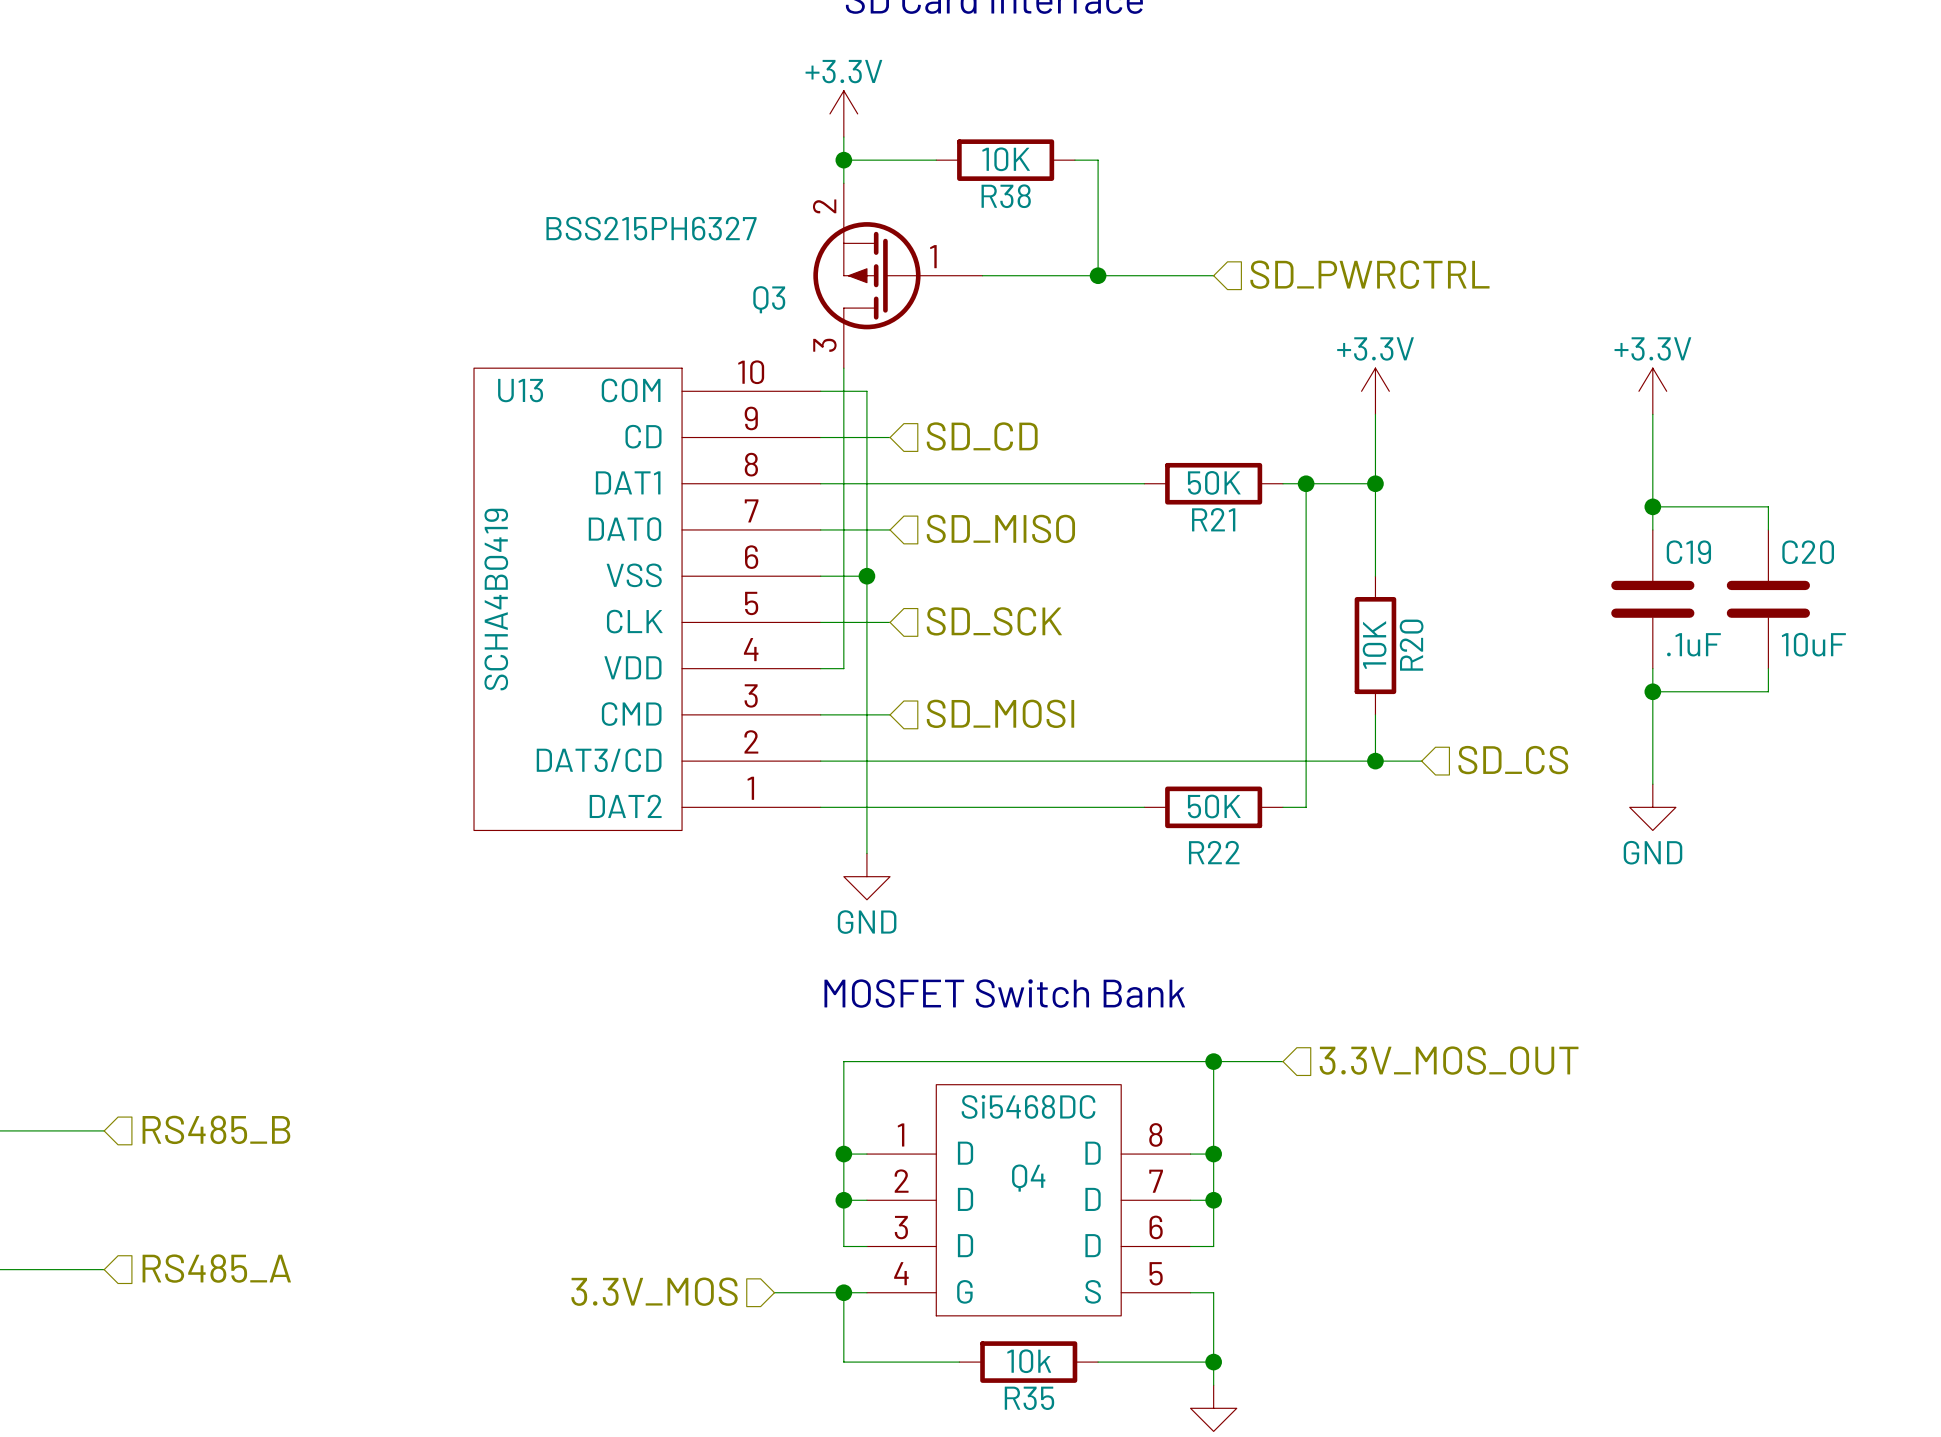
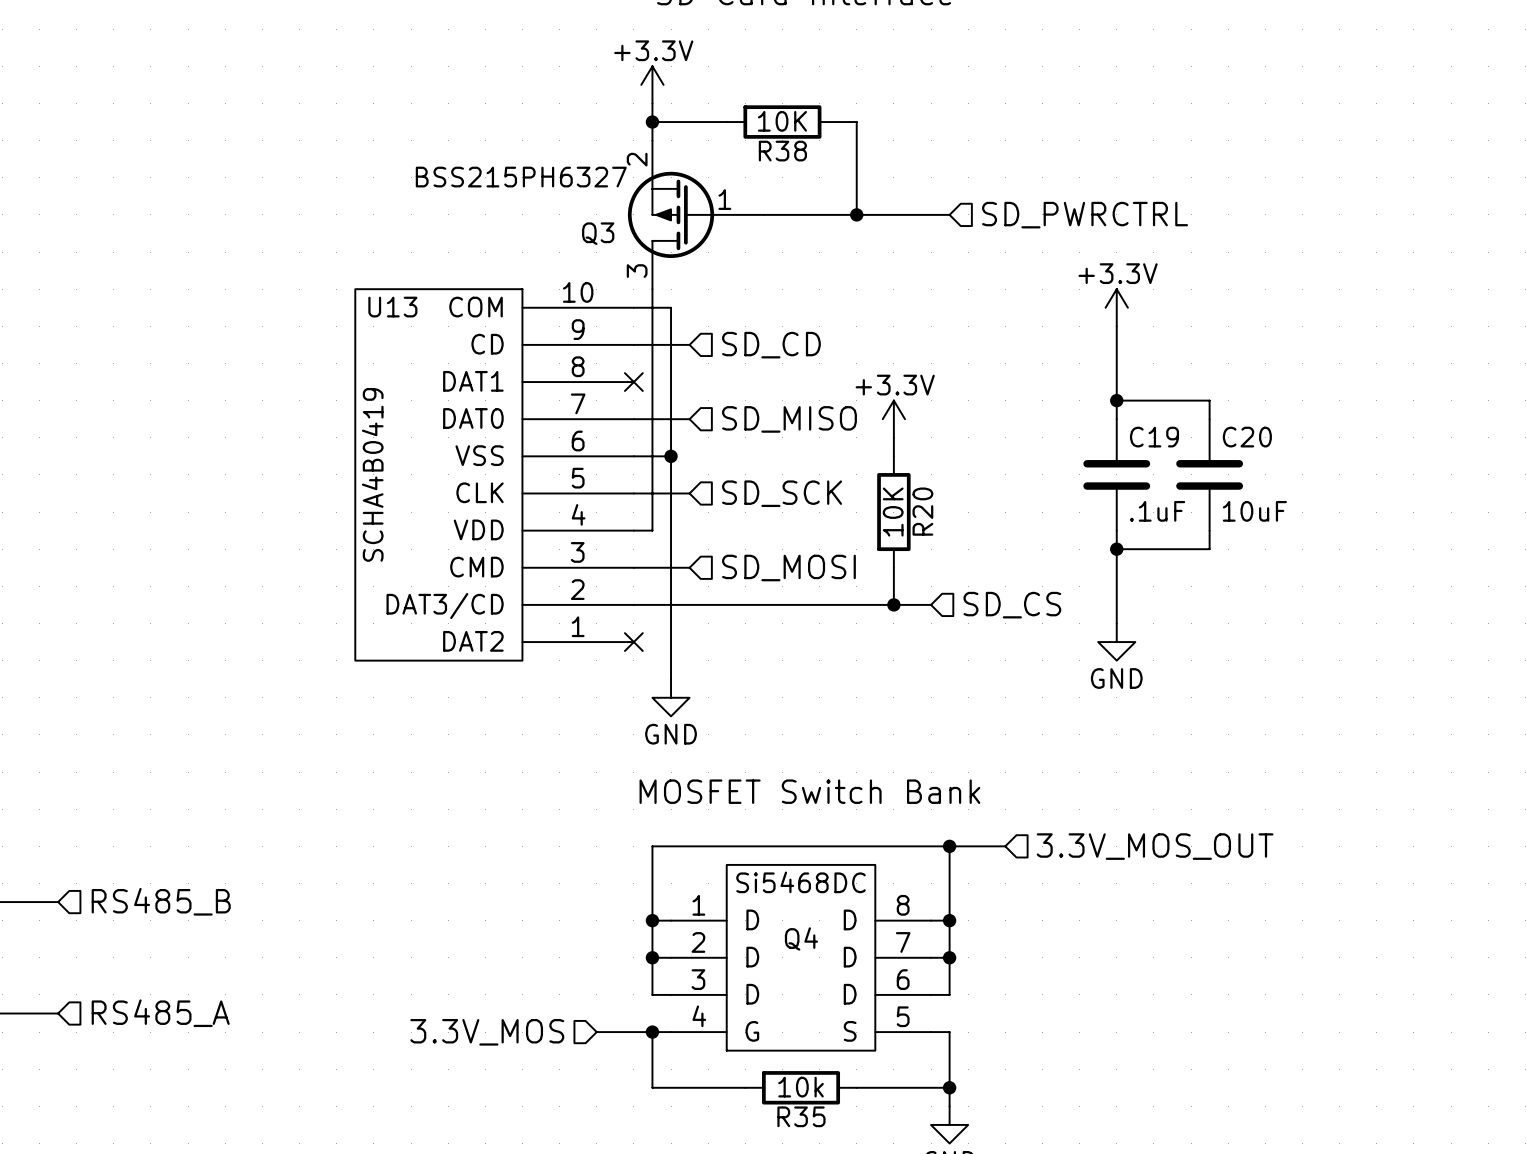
power symbol position: +3.3V (1375, 391) -> +3.3V (1116, 307)
power symbol: +3.3V (1652, 391) -> none
wire: (1375, 414) (1375, 576) -> none
wire: (1652, 414) (1652, 529) -> (1116, 326) (1116, 419)
wire: (820, 483) (1144, 483) -> none
no-connect mark: none -> (633, 382)
R21: 50K (1213, 483) -> none
wire: (1282, 483) (1375, 483) -> none
wire: (1306, 483) (1306, 807) (1282, 807) -> none
junction: (1306, 483) -> none
junction position: (1375, 483) -> (1116, 400)
wire: (1652, 506) (1768, 506) (1768, 529) -> (1116, 400) (1209, 400) (1209, 419)
junction: (1652, 506) -> none
power symbol: none -> +3.3V (893, 419)
wire: none -> (893, 437) (893, 456)
C19 position: (1652, 599) -> (1116, 474)
C20 position: (1768, 599) -> (1209, 474)
R20 position: (1375, 645) -> (893, 512)
wire: (1652, 668) (1652, 784) -> (1116, 530) (1116, 623)
wire: (1768, 668) (1768, 691) (1652, 691) -> (1209, 530) (1209, 549) (1116, 549)
junction: (1652, 691) -> none
wire: (1375, 714) (1375, 761) -> (893, 567) (893, 604)
hierarchical label position: SD_CS (1513, 760) -> SD_CS (1012, 605)
junction: none -> (893, 604)
wire: (1190, 761) (1421, 761) -> none
junction position: (1375, 761) -> (1116, 549)
wire: (820, 807) (1144, 807) -> none
no-connect mark: none -> (633, 642)
R22: 50K (1213, 807) -> none
power symbol position: GND (1652, 807) -> GND (1116, 642)

